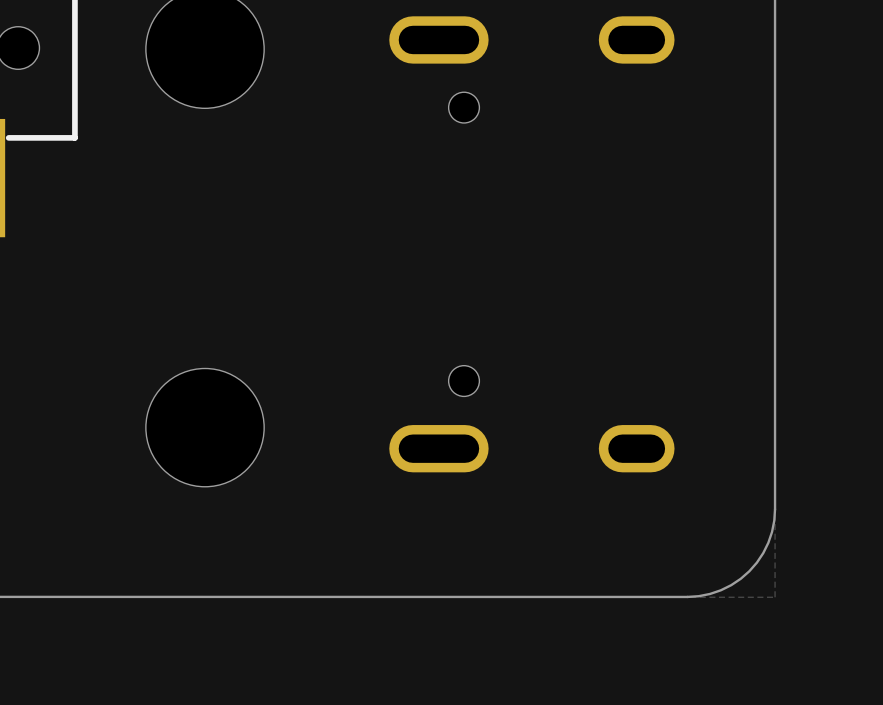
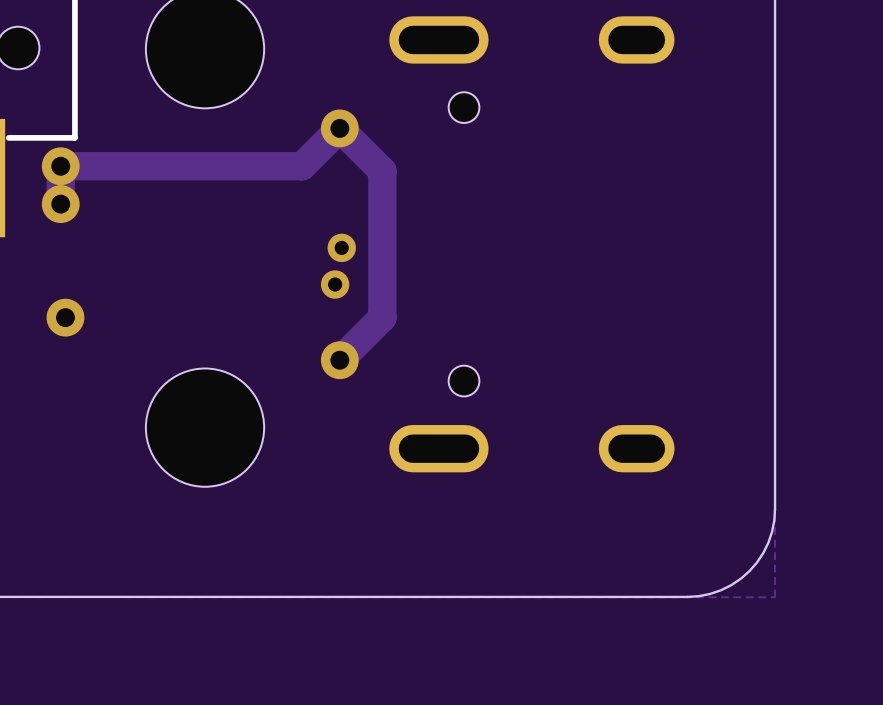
via: none -> (339, 128)
via: none -> (60, 166)
track: none -> (60, 204) (60, 166) (301, 166) (339, 128) (382, 171) (382, 317) (339, 360)
via: none -> (60, 204)
via: none -> (341, 247)
via: none -> (335, 284)
via: none -> (65, 317)
via: none -> (339, 360)

